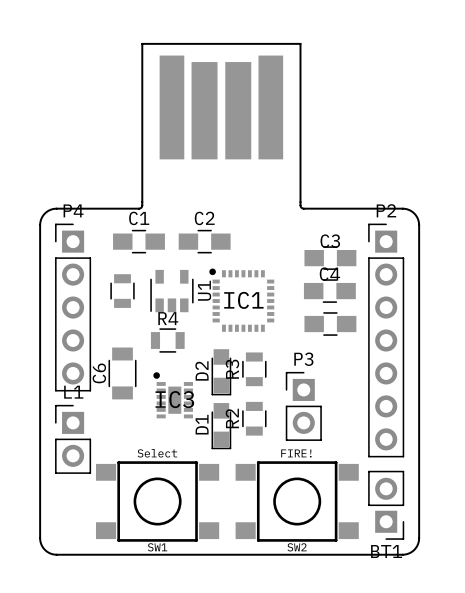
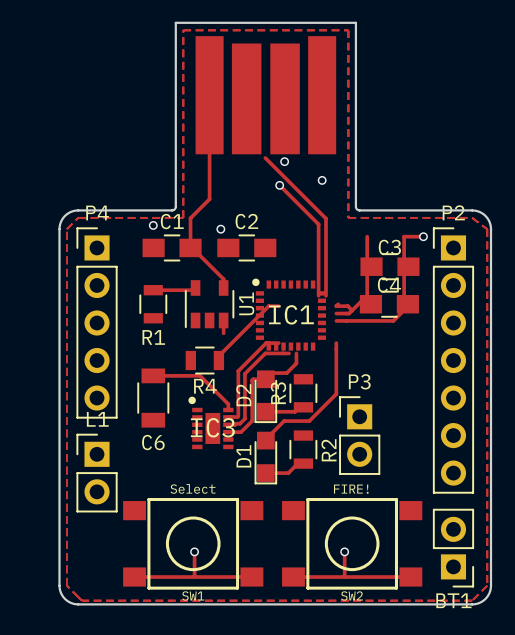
zone outline: none -> (183, 30) (183, 217) (78, 217) (67, 229) (67, 585) (82, 600) (472, 600) (487, 585) (487, 229) (472, 217) (348, 217) (348, 30) (183, 30)
track: none -> (209, 95) (209, 199) (190, 218) (190, 247) (223, 279) (223, 287)
track: none -> (265, 157) (326, 218) (326, 295)
via: none -> (284, 161)
via: none -> (322, 180)
track: none -> (279, 185) (318, 224) (318, 295)
via: none -> (279, 185)
via: none -> (153, 225)
via: none -> (220, 229)
track: none -> (367, 236) (367, 296) (349, 313) (336, 313)
track: none -> (423, 236) (404, 236) (404, 309) (393, 320) (336, 320)
via: none -> (423, 236)
track: none -> (195, 287) (193, 290) (153, 290)
track: none -> (338, 304) (336, 306) (347, 306) (352, 310)
track: none -> (278, 306) (268, 306) (218, 356) (218, 360)
track: none -> (223, 320) (223, 333)
R4 name position: R4 (168, 318) -> R4 (205, 386)
R1 name: none -> R1 (153, 337)
part: (330, 324) -> none
track: none -> (278, 343) (266, 343) (238, 371) (238, 416) (228, 417)
track: none -> (336, 343) (336, 394) (309, 421) (284, 421) (265, 440)
track: none -> (289, 353) (265, 353) (244, 373) (244, 418) (240, 423) (228, 424)
track: none -> (296, 353) (296, 363) (286, 373) (272, 373) (265, 379) (252, 380) (252, 420) (241, 432) (228, 432)
track: none -> (153, 375) (200, 375) (228, 404) (228, 410)
C6 name rotation: 0° (99, 373) -> 90° clockwise (153, 442)
C6 name position: C6 (99, 373) -> C6 (153, 442)
track: none -> (295, 411) (265, 411)
R2 name position: R2 (232, 418) -> R2 (328, 450)
track: none -> (295, 465) (288, 473) (265, 473)
track: none -> (194, 551) (194, 577)
via: none -> (194, 551)
track: none -> (344, 551) (344, 577)
via: none -> (344, 551)
track: none -> (134, 577) (251, 577)
track: none -> (293, 577) (410, 577)

